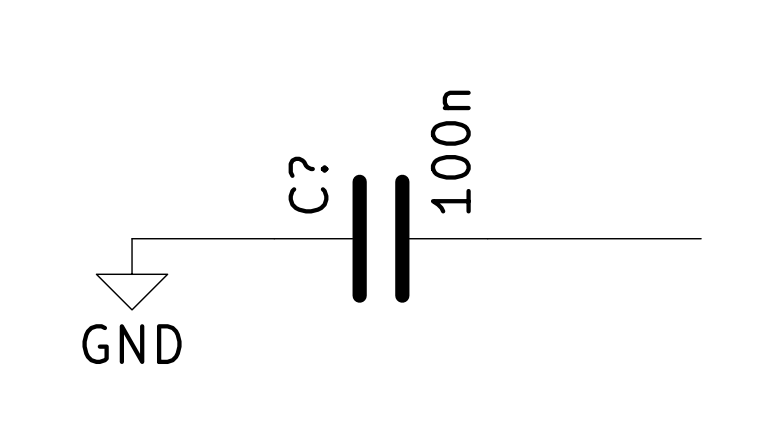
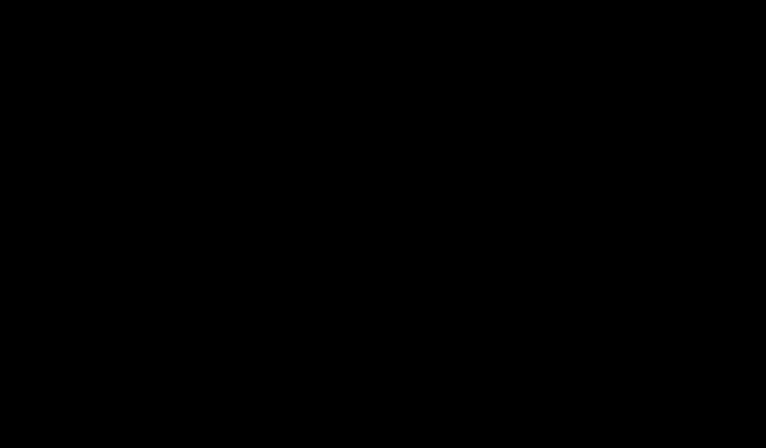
wire: (132, 238) (274, 238) -> none
C?: 100n (381, 238) -> none
wire: (487, 238) (701, 238) -> none
power symbol: GND (132, 274) -> none

